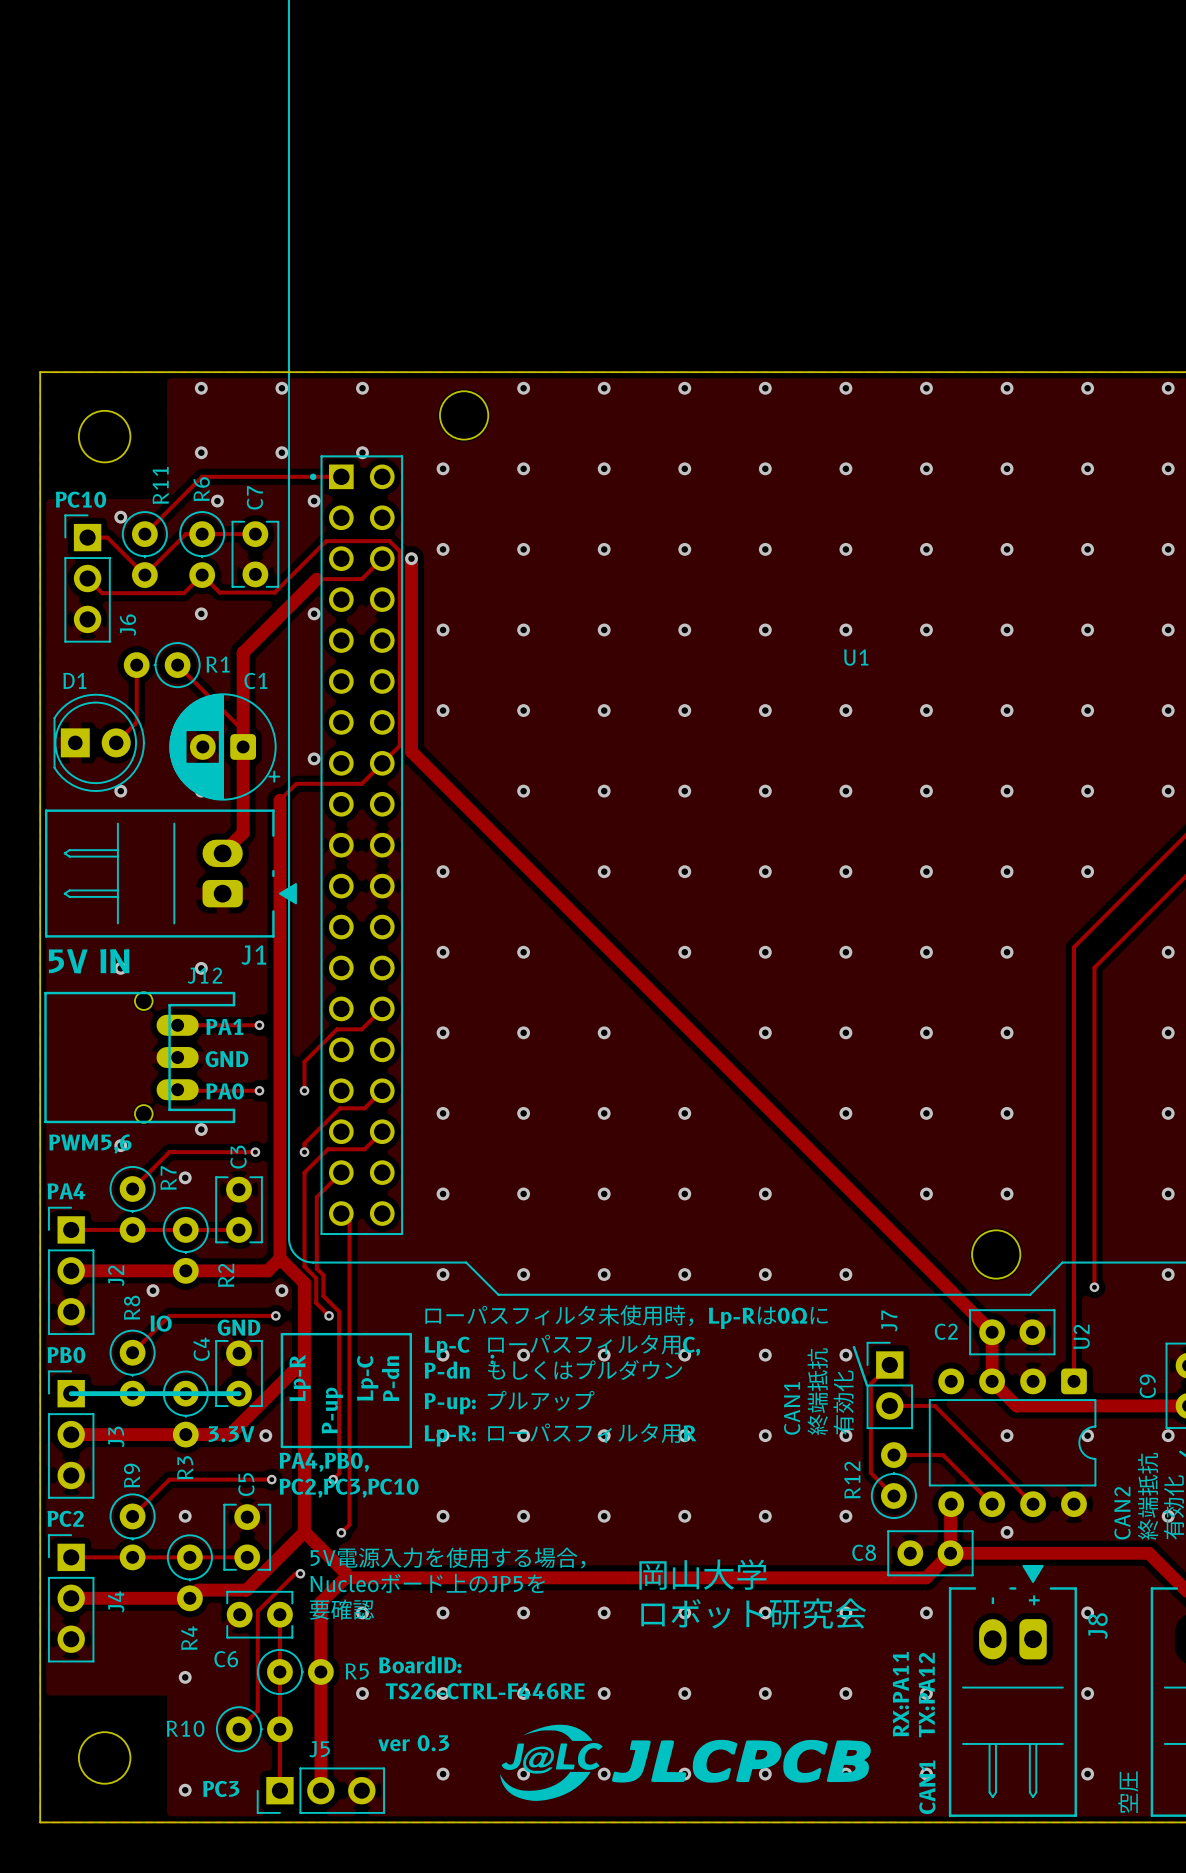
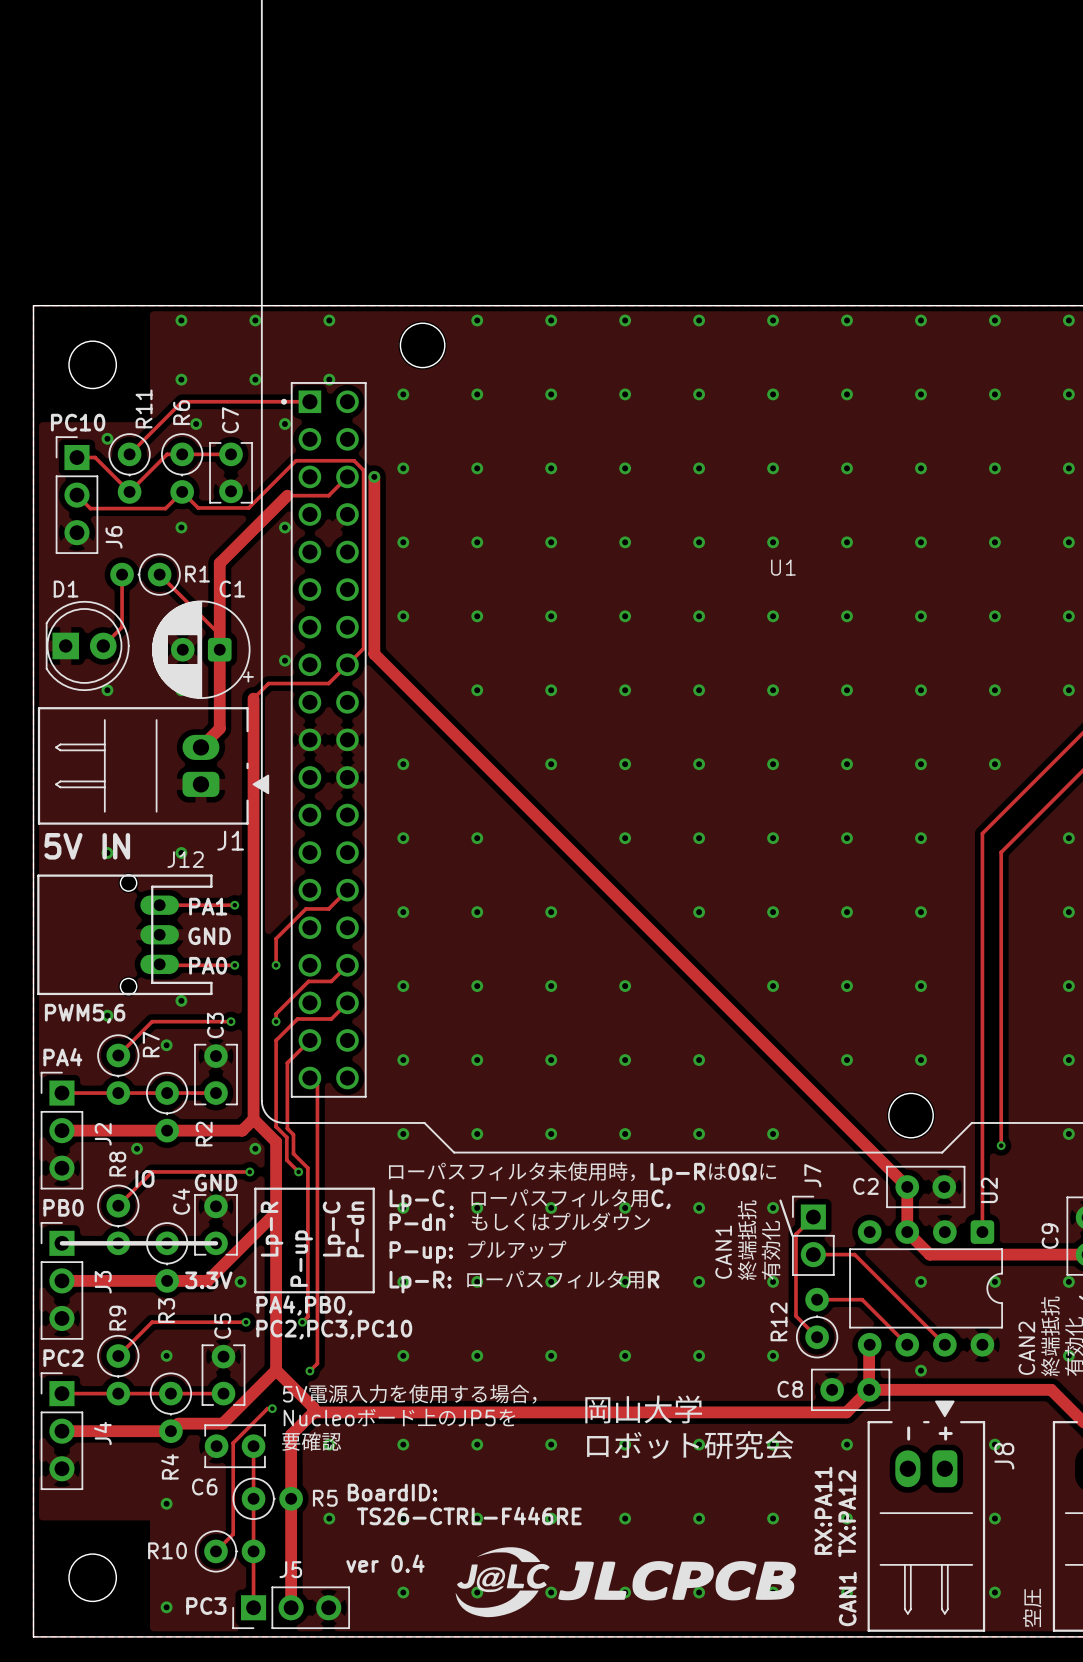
text: ver 0.3 (413, 1743) -> ver 0.4 (385, 1563)

